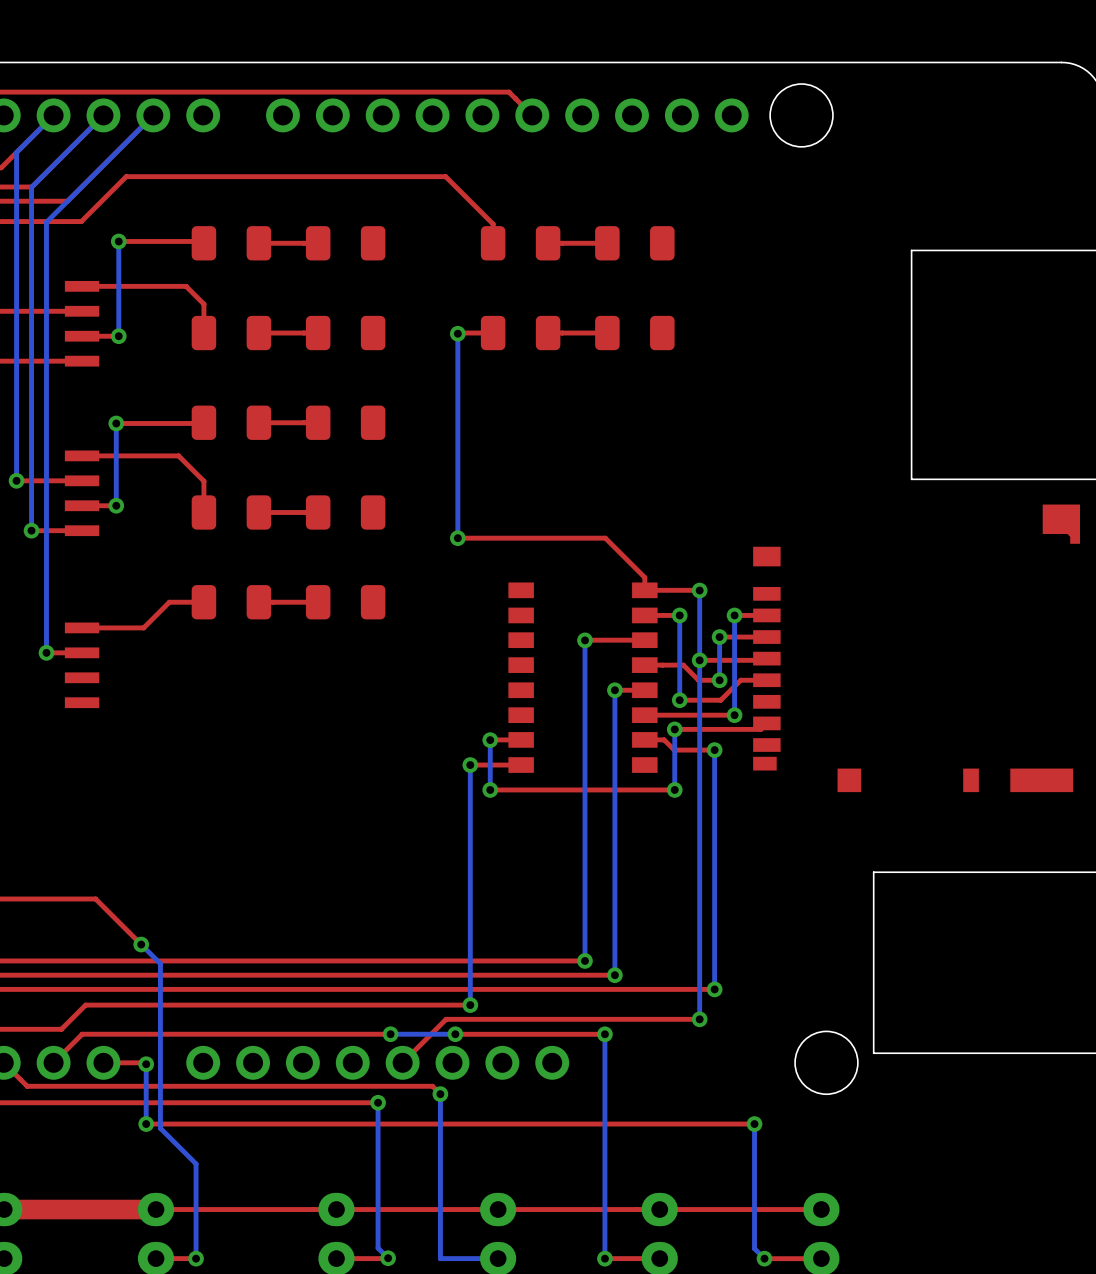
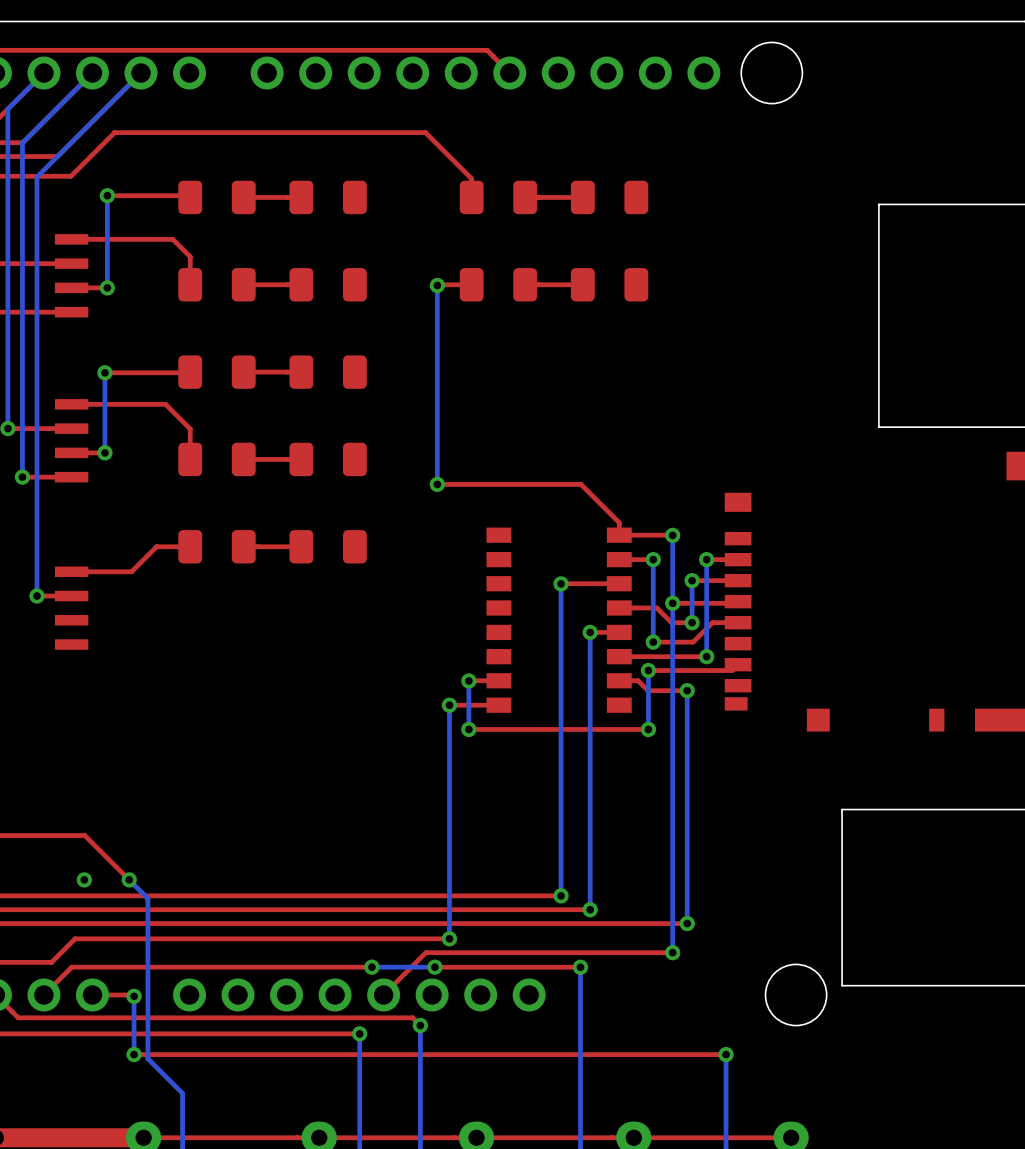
via: none -> (84, 879)

